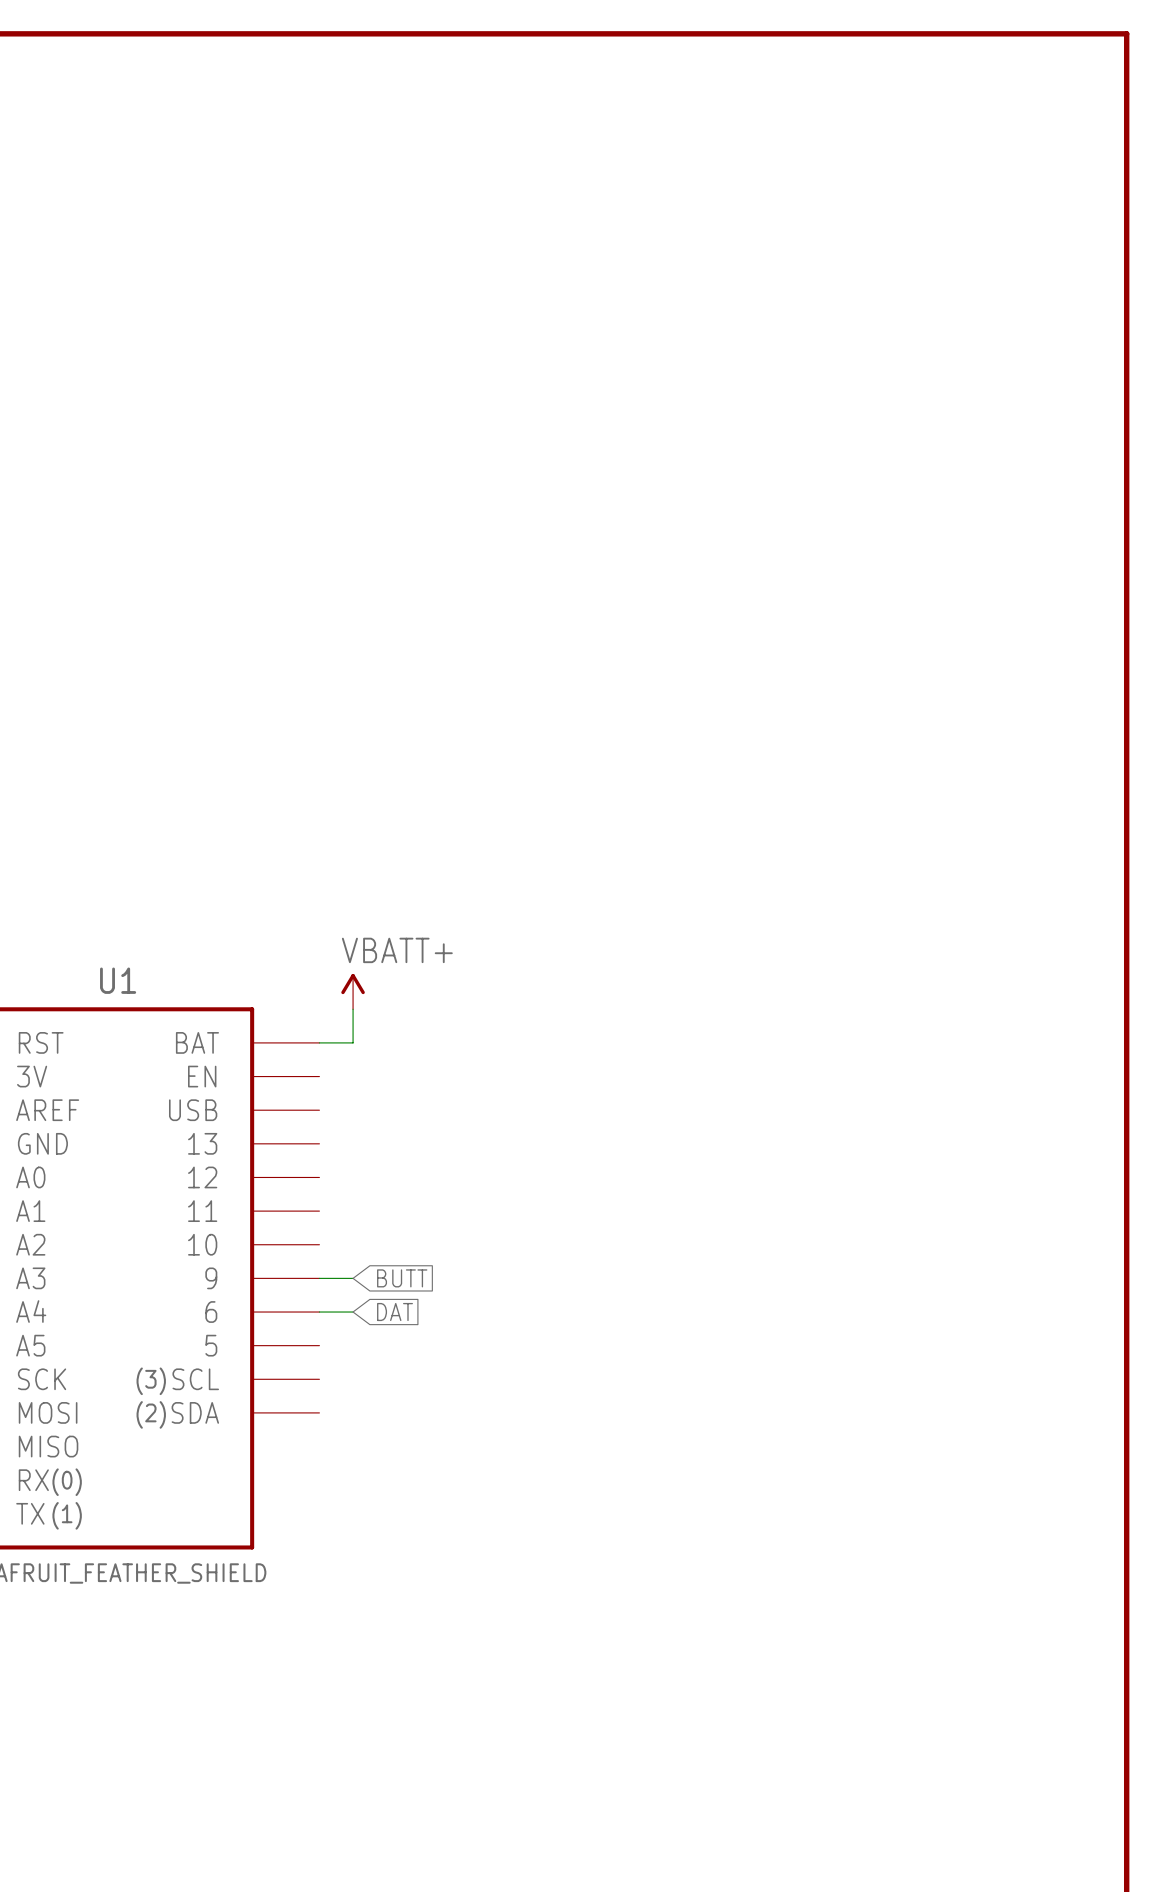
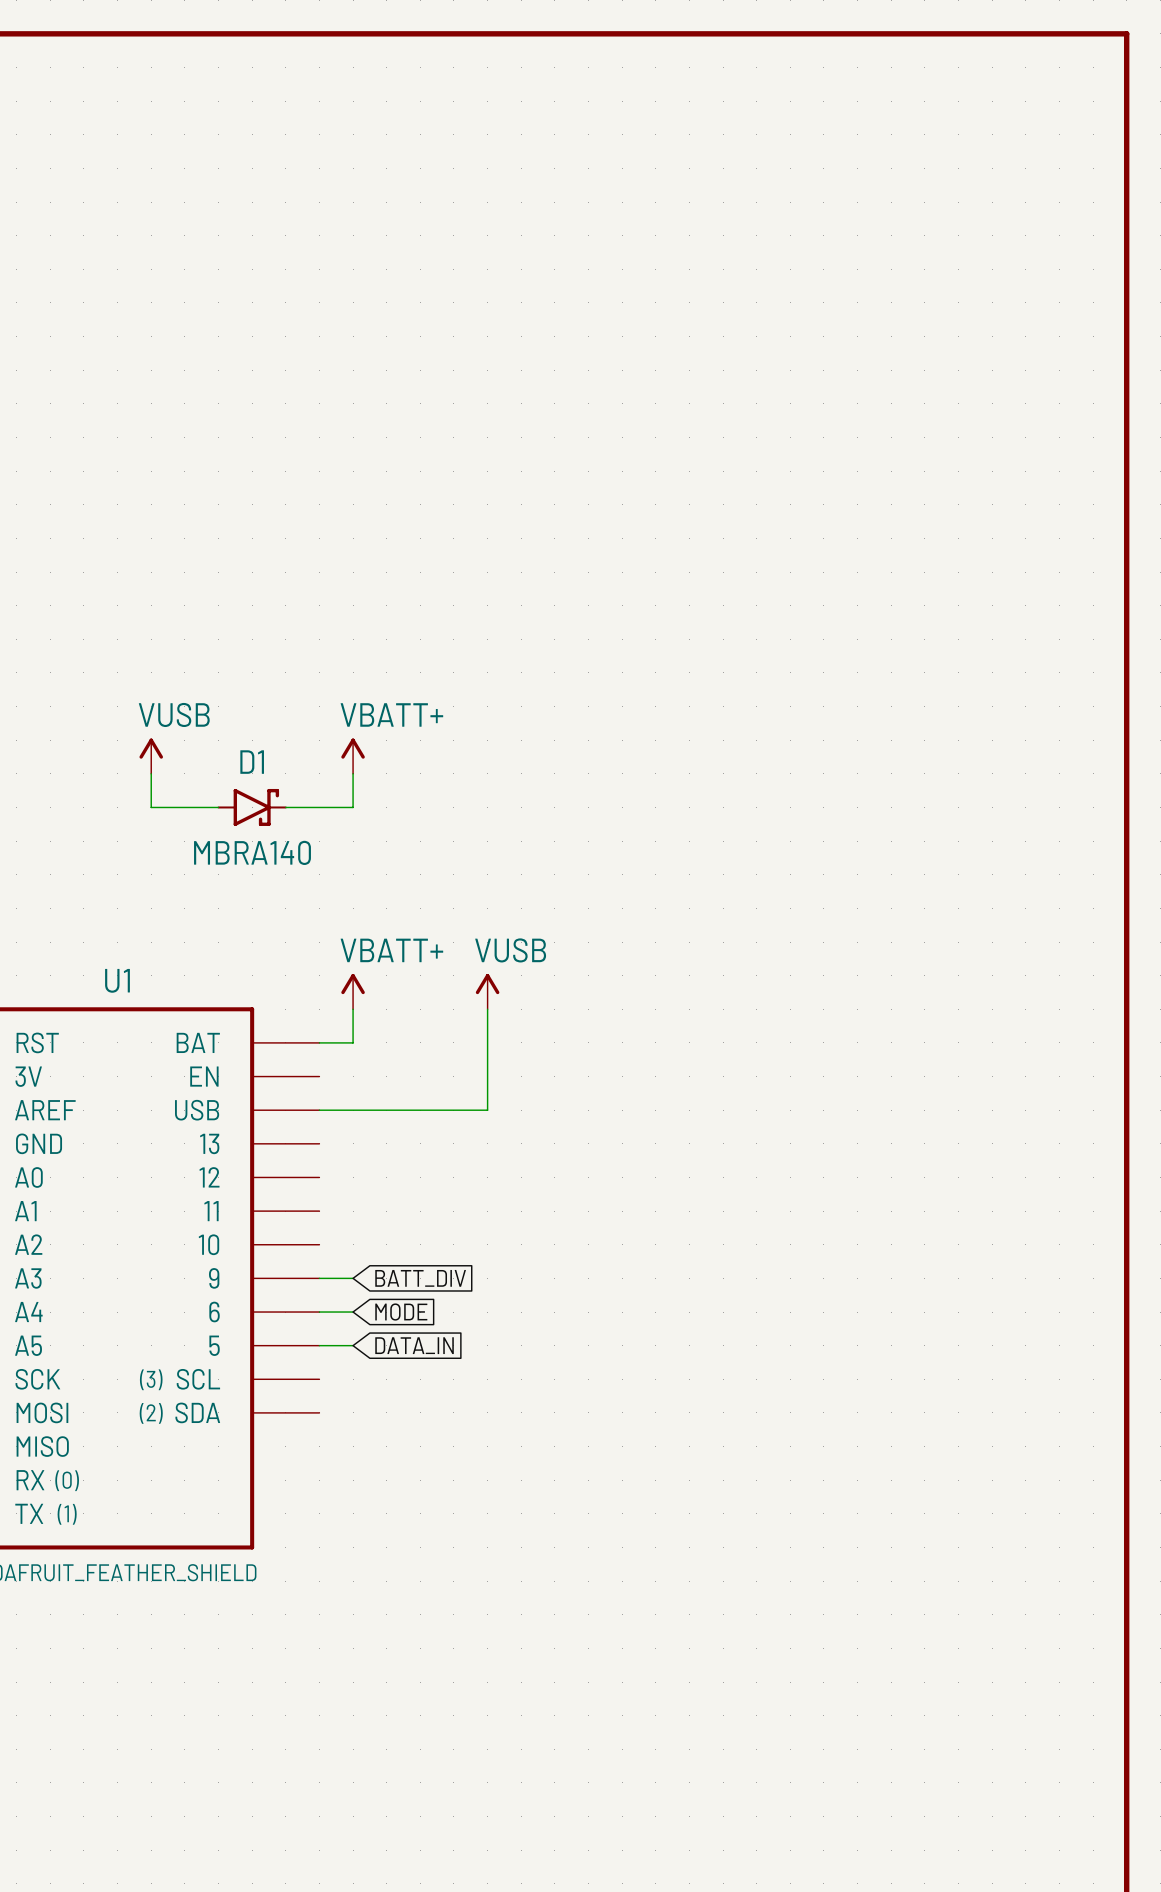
power symbol: none -> VUSB (151, 756)
power symbol: none -> VBATT+ (353, 756)
wire: none -> (151, 773) (151, 807) (218, 807)
wire: none -> (353, 773) (353, 807) (285, 807)
D1: none -> MBRA140 (252, 807)
power symbol: none -> VUSB (487, 991)
wire: none -> (487, 1009) (487, 1110) (319, 1110)
global label: BUTT (402, 1278) -> BATT_DIV (420, 1278)
global label: DAT (395, 1312) -> MODE (401, 1312)
wire: none -> (319, 1345) (353, 1345)
global label: none -> DATA_IN (414, 1345)

